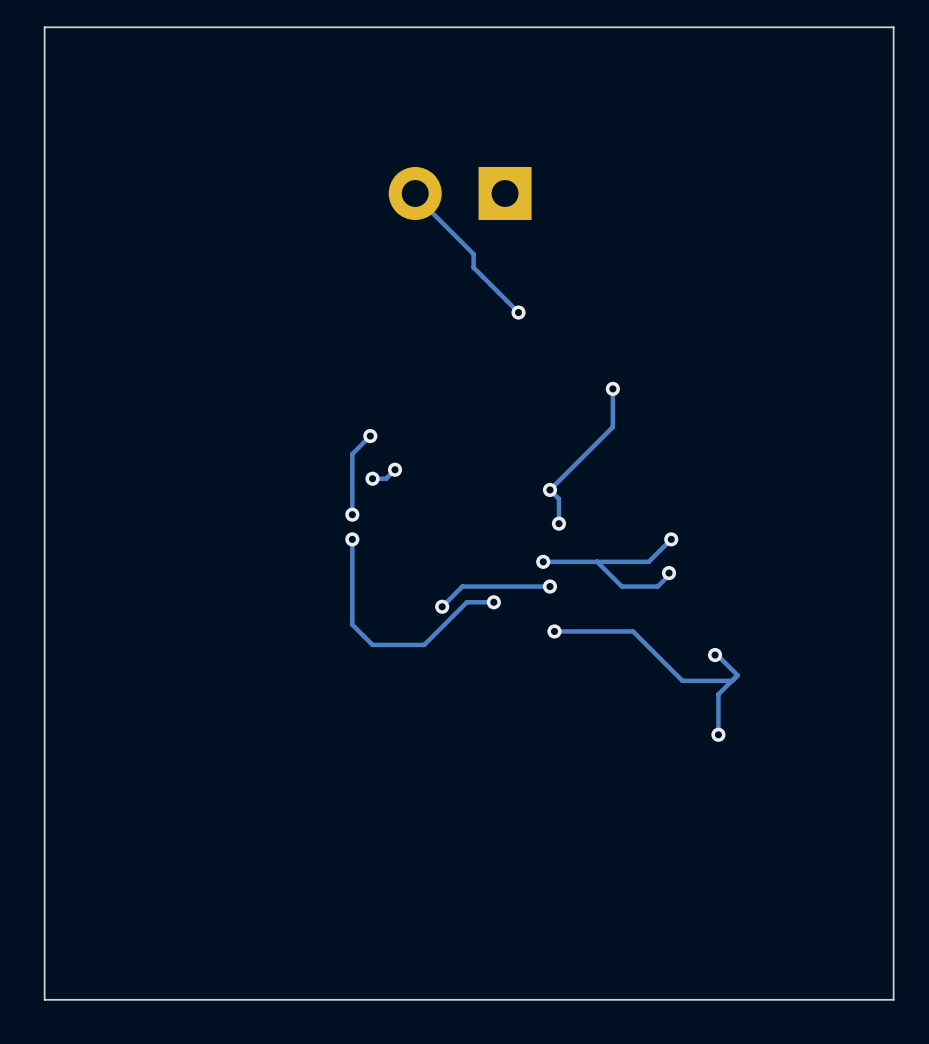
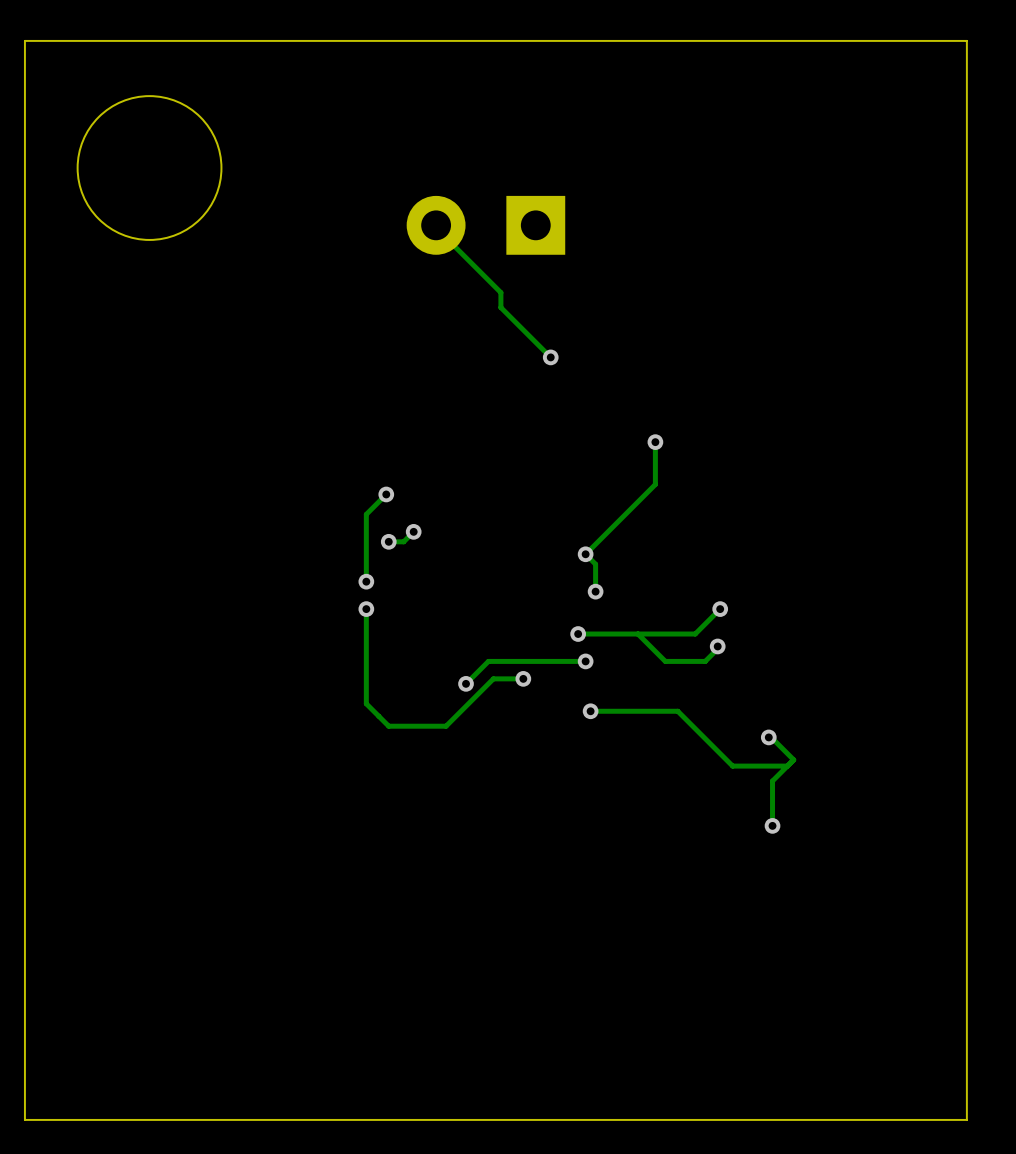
round board edge: none -> [76, 95, 223, 241]

